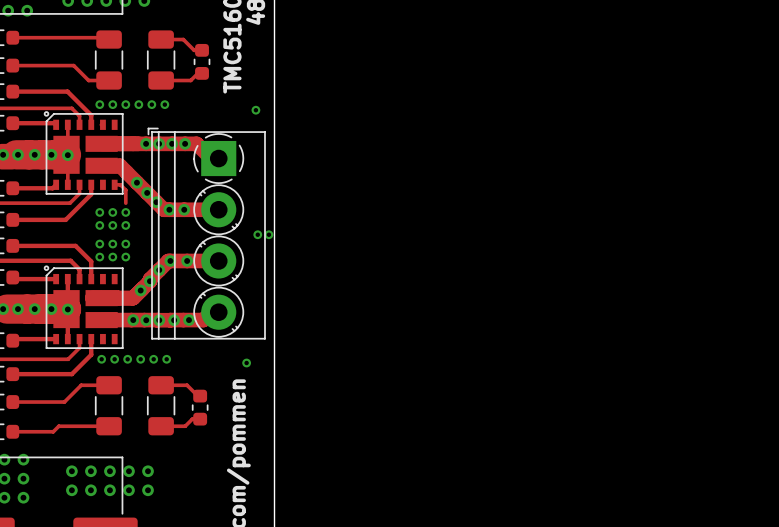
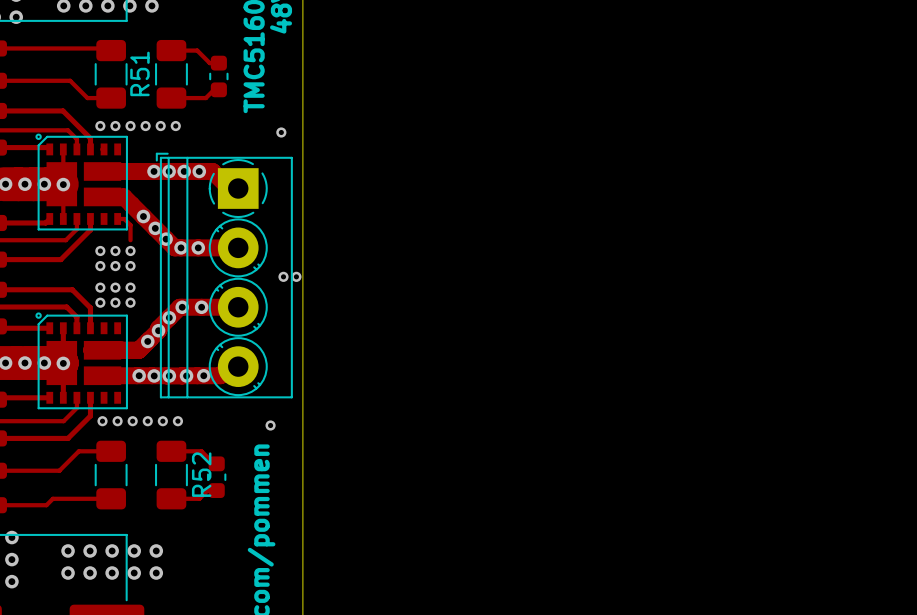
R51 name: none -> R51 (139, 73)
R52 name: none -> R52 (201, 474)

